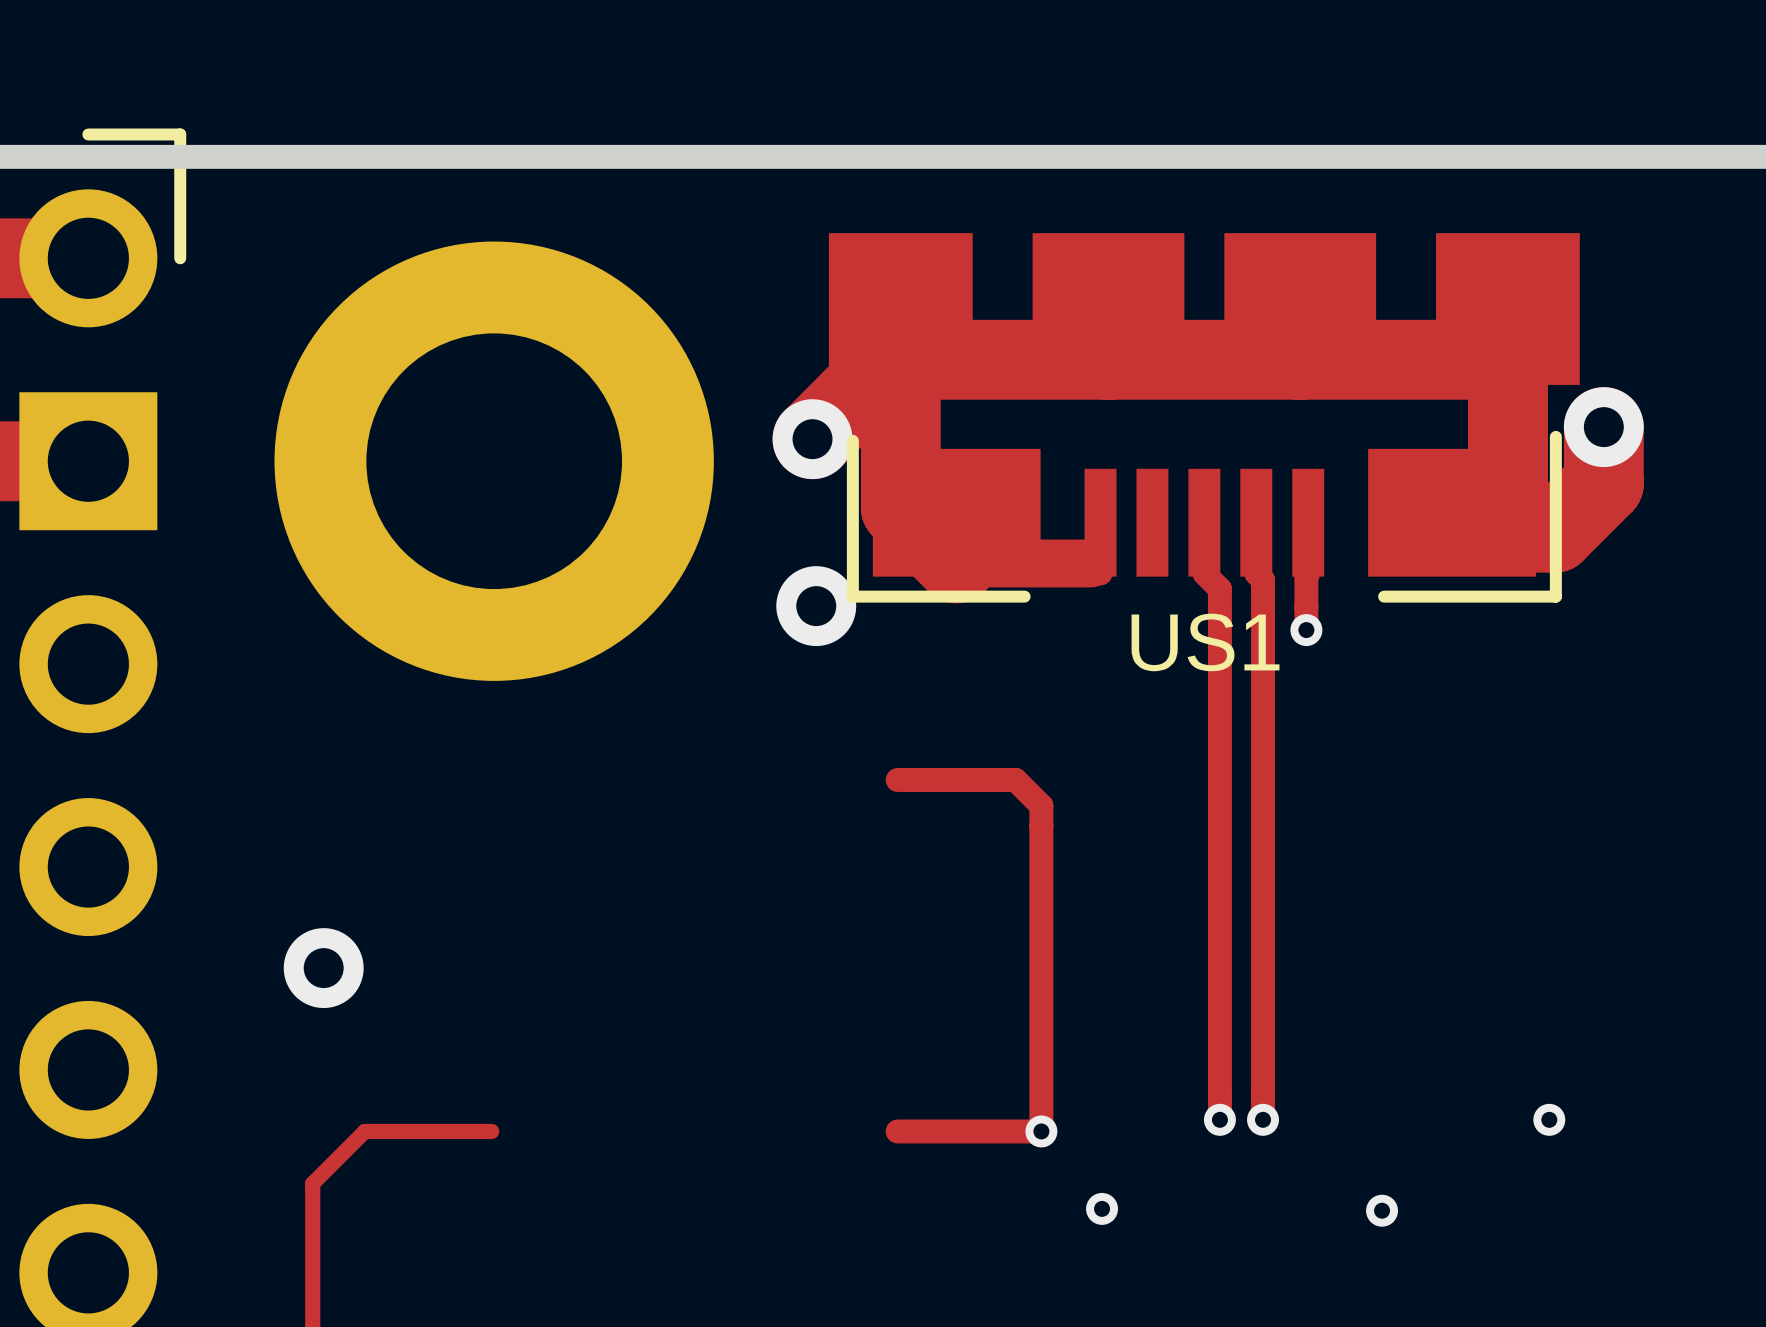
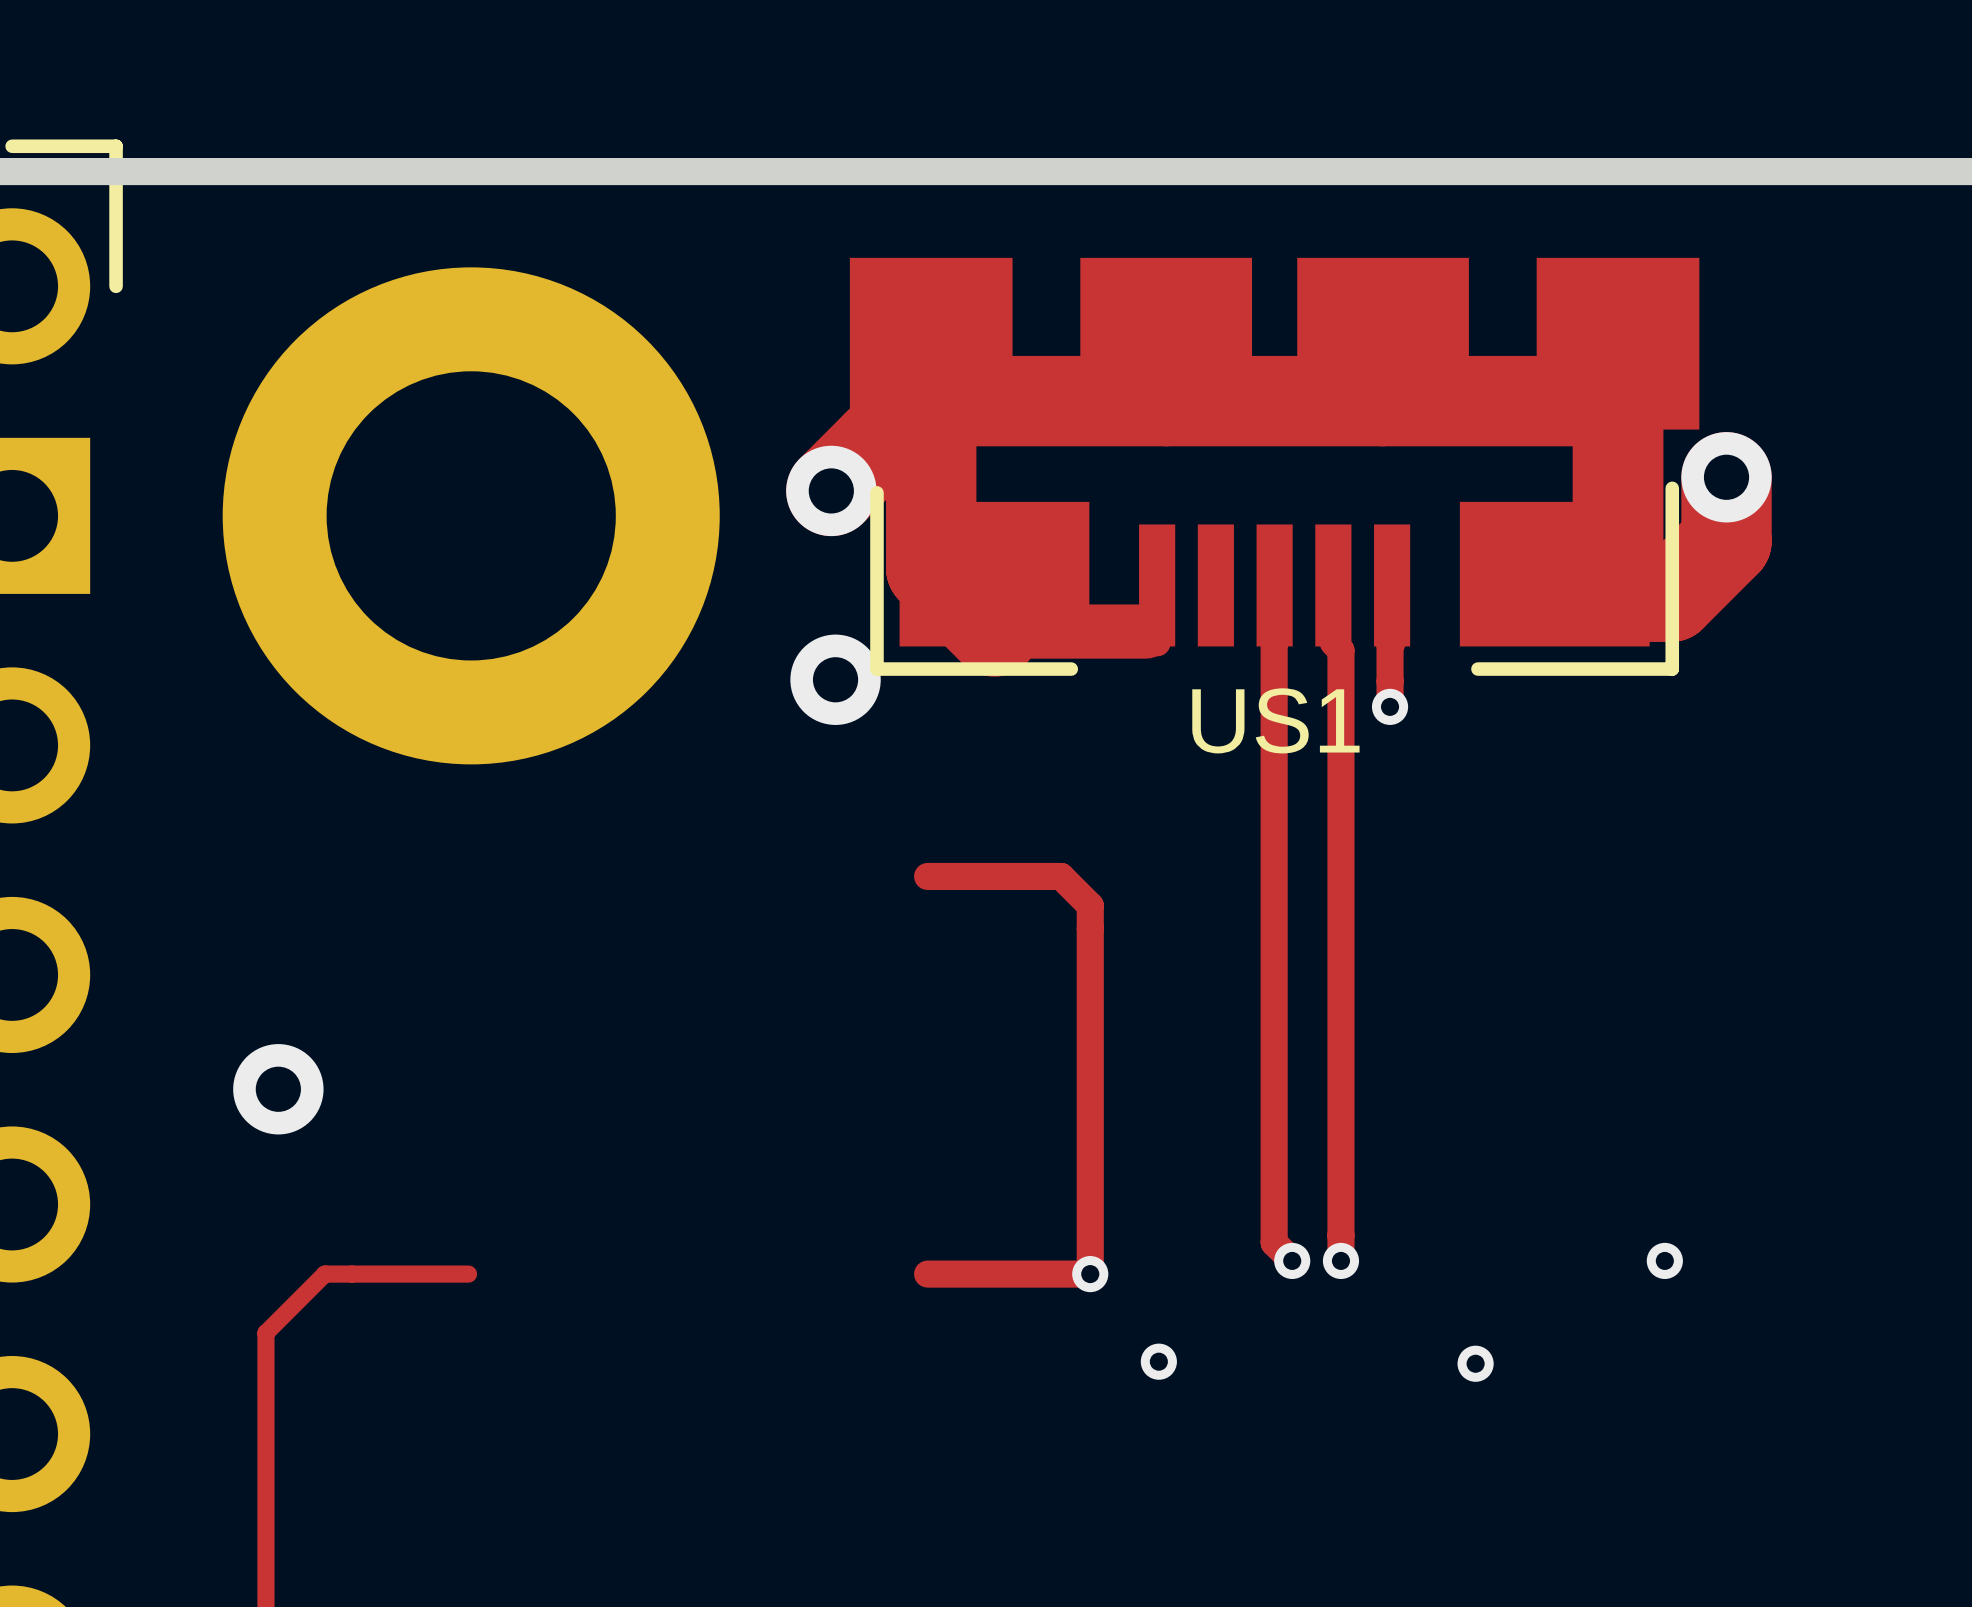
track: (1204, 573) (1219, 589) (1219, 1119) -> (1274, 643) (1274, 1242) (1292, 1260)

